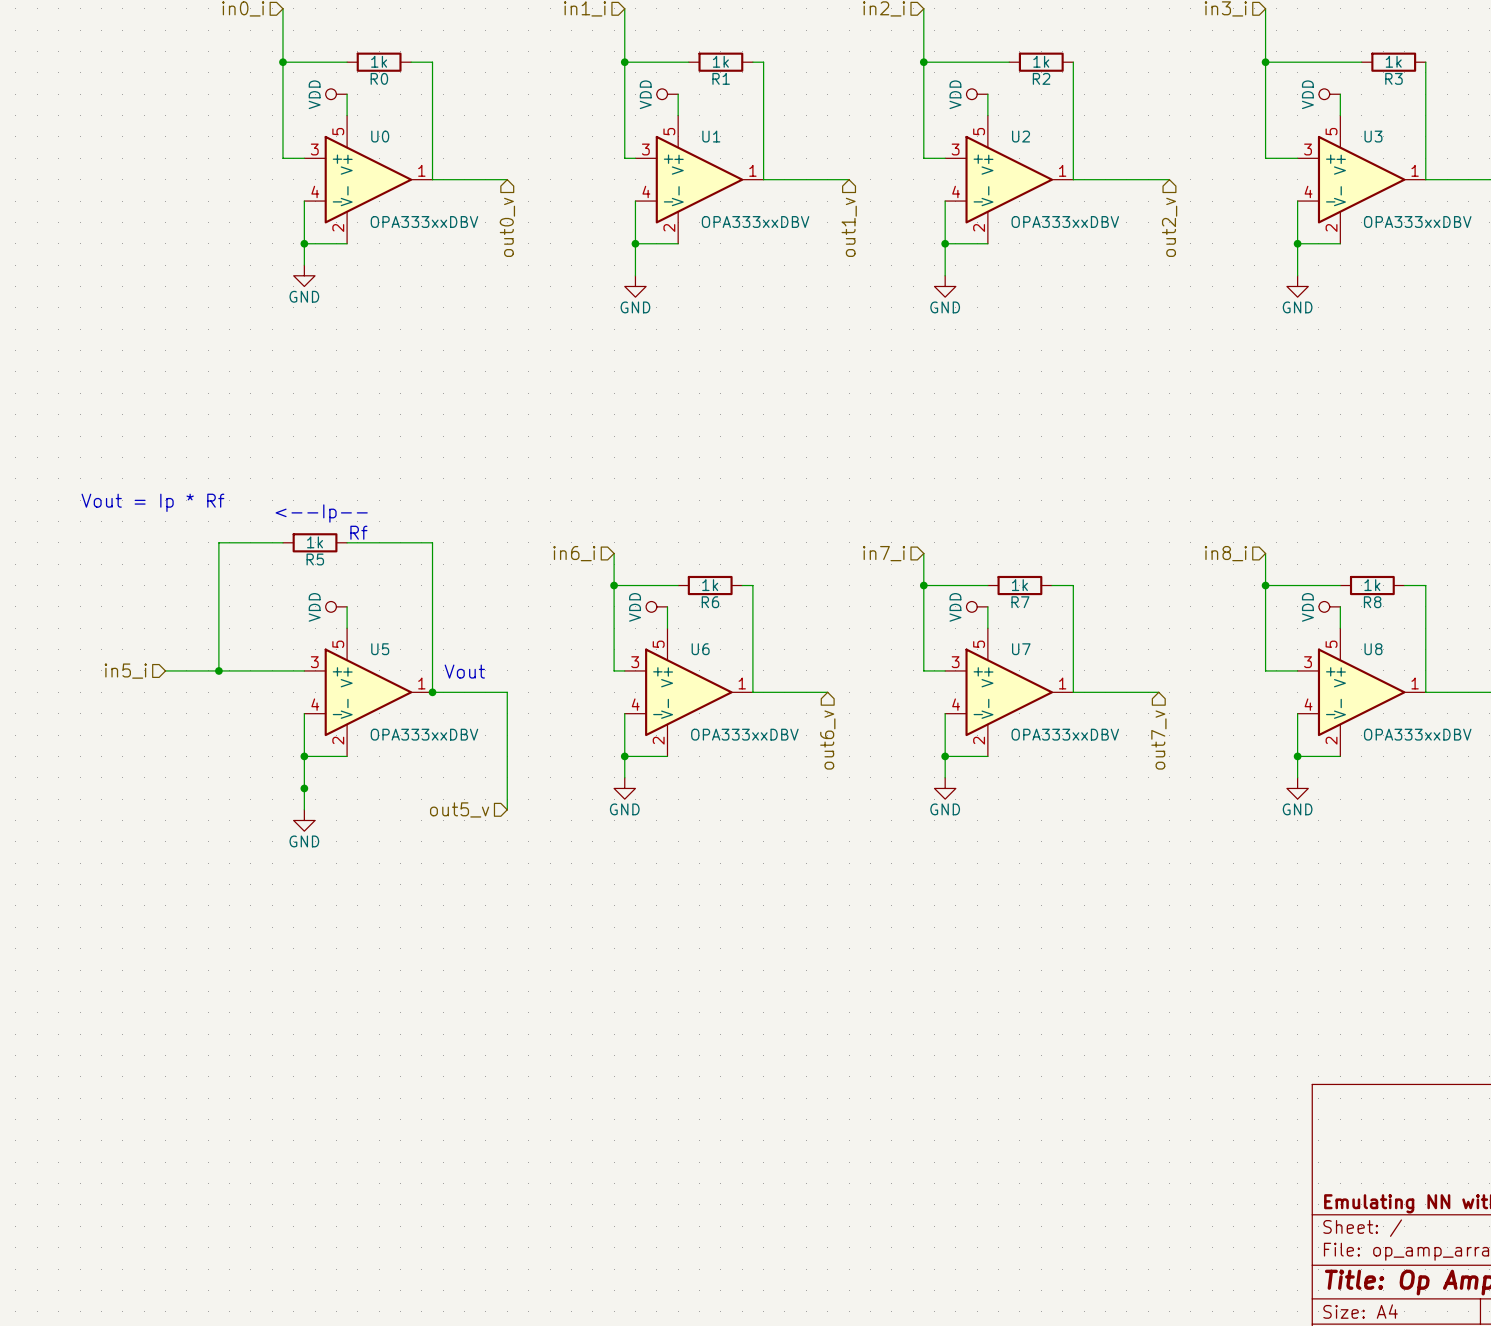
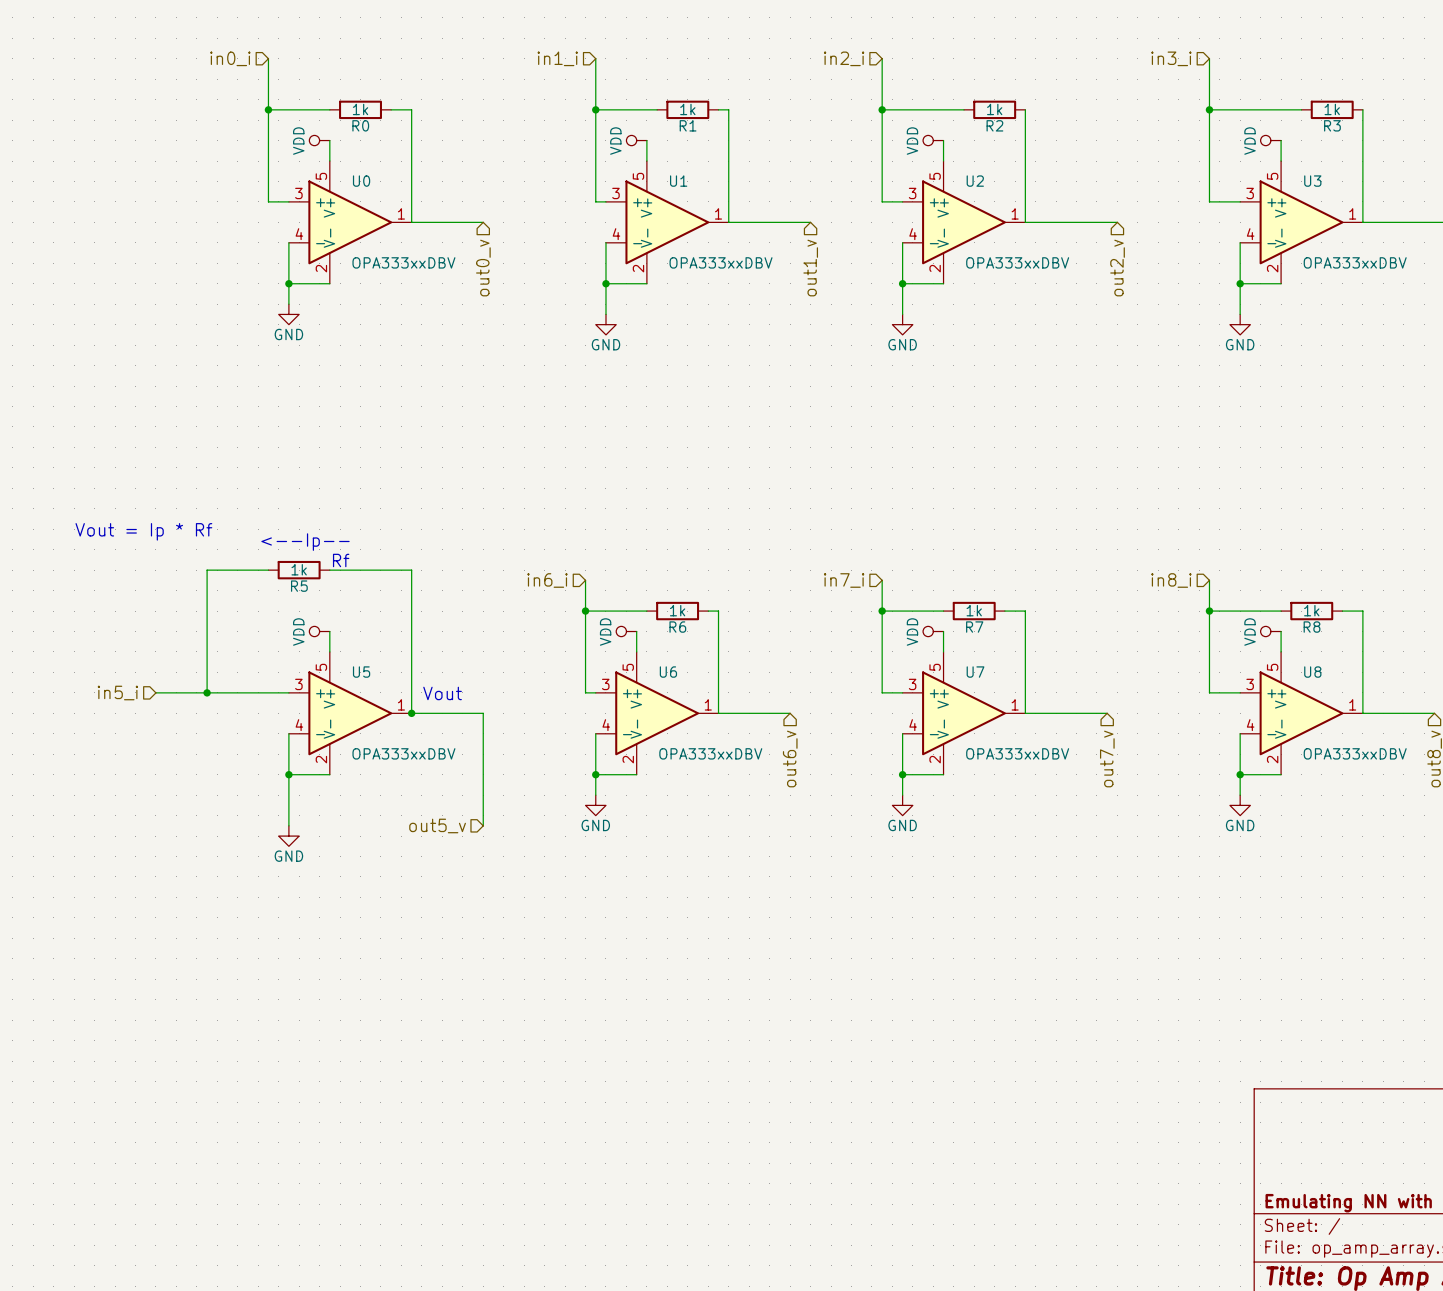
junction: (304, 788) -> none

